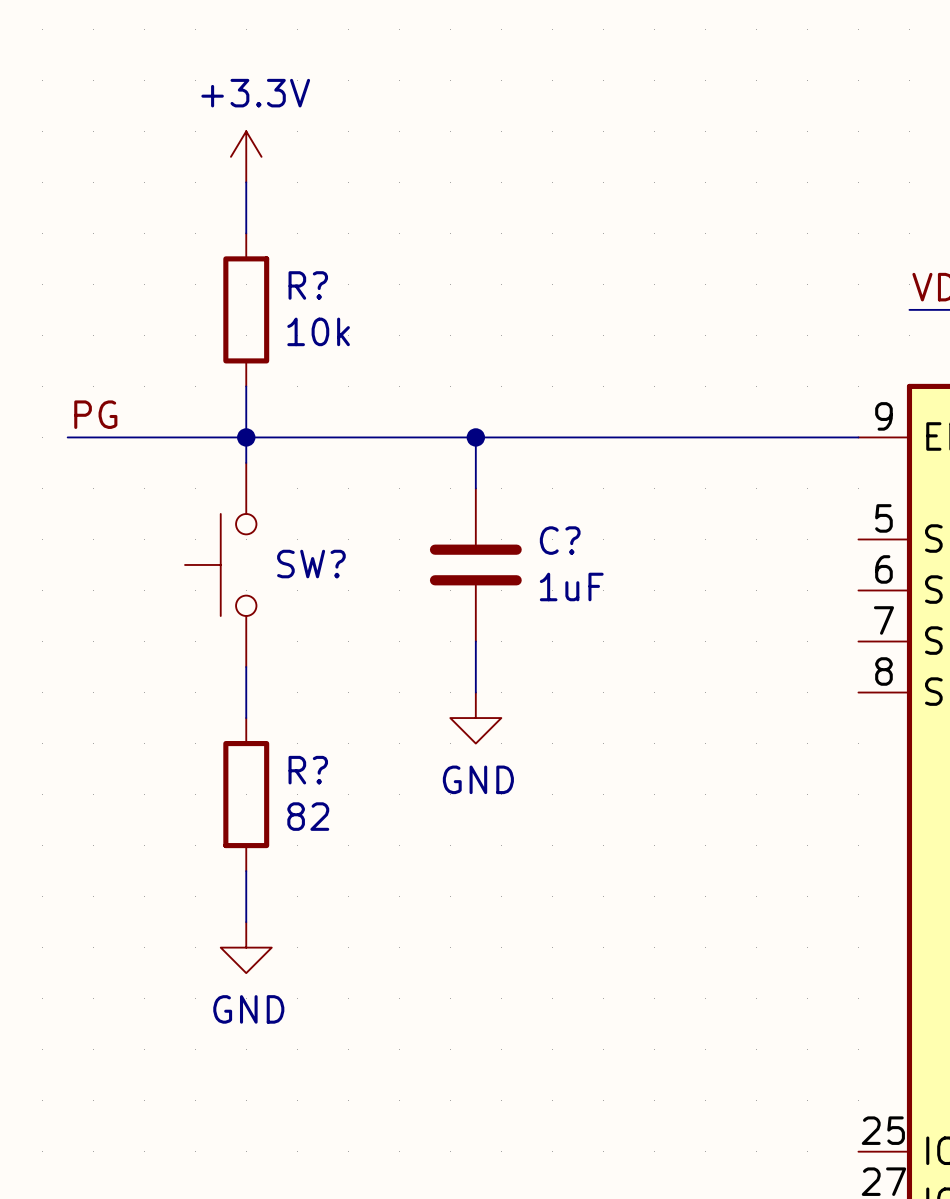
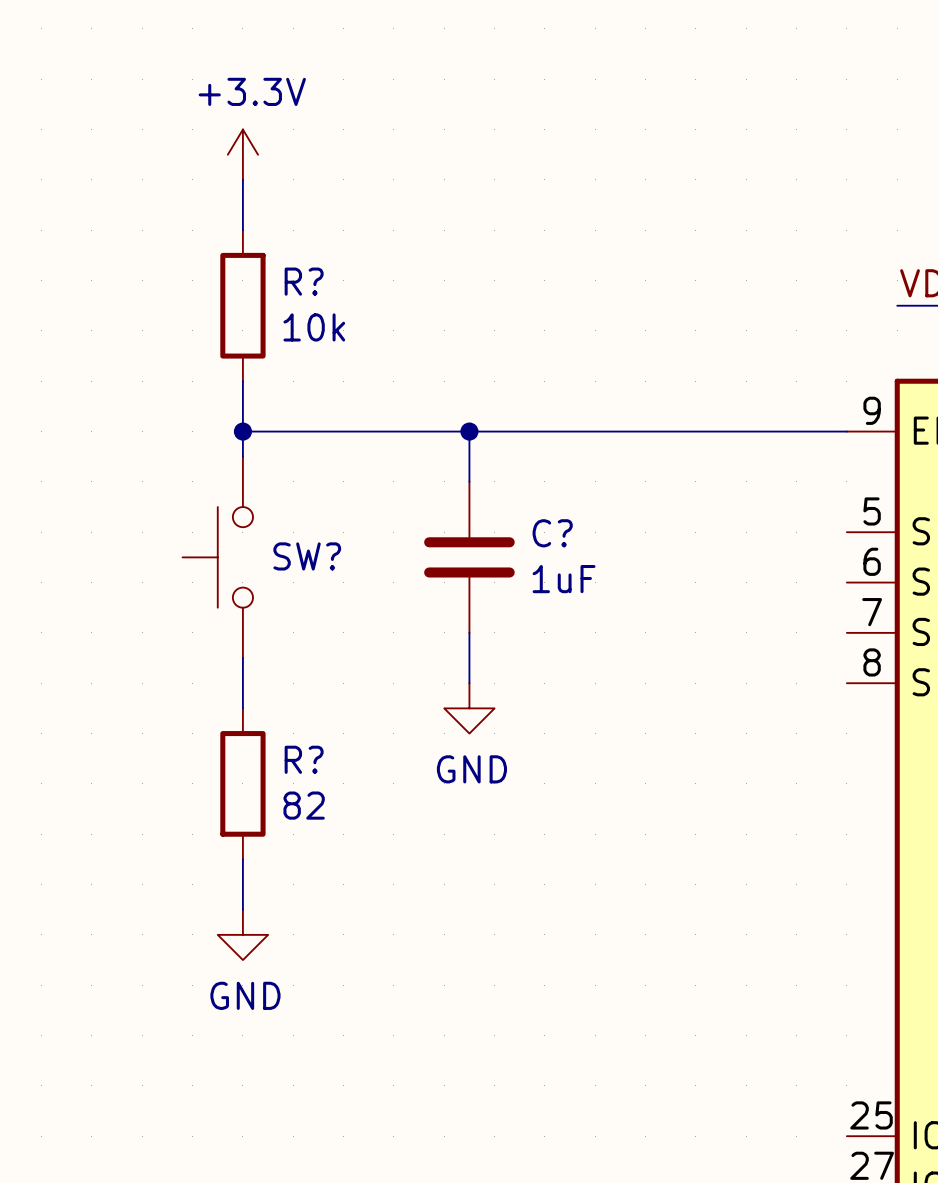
label: PG (95, 414) -> none
wire: (67, 437) (246, 437) -> none

